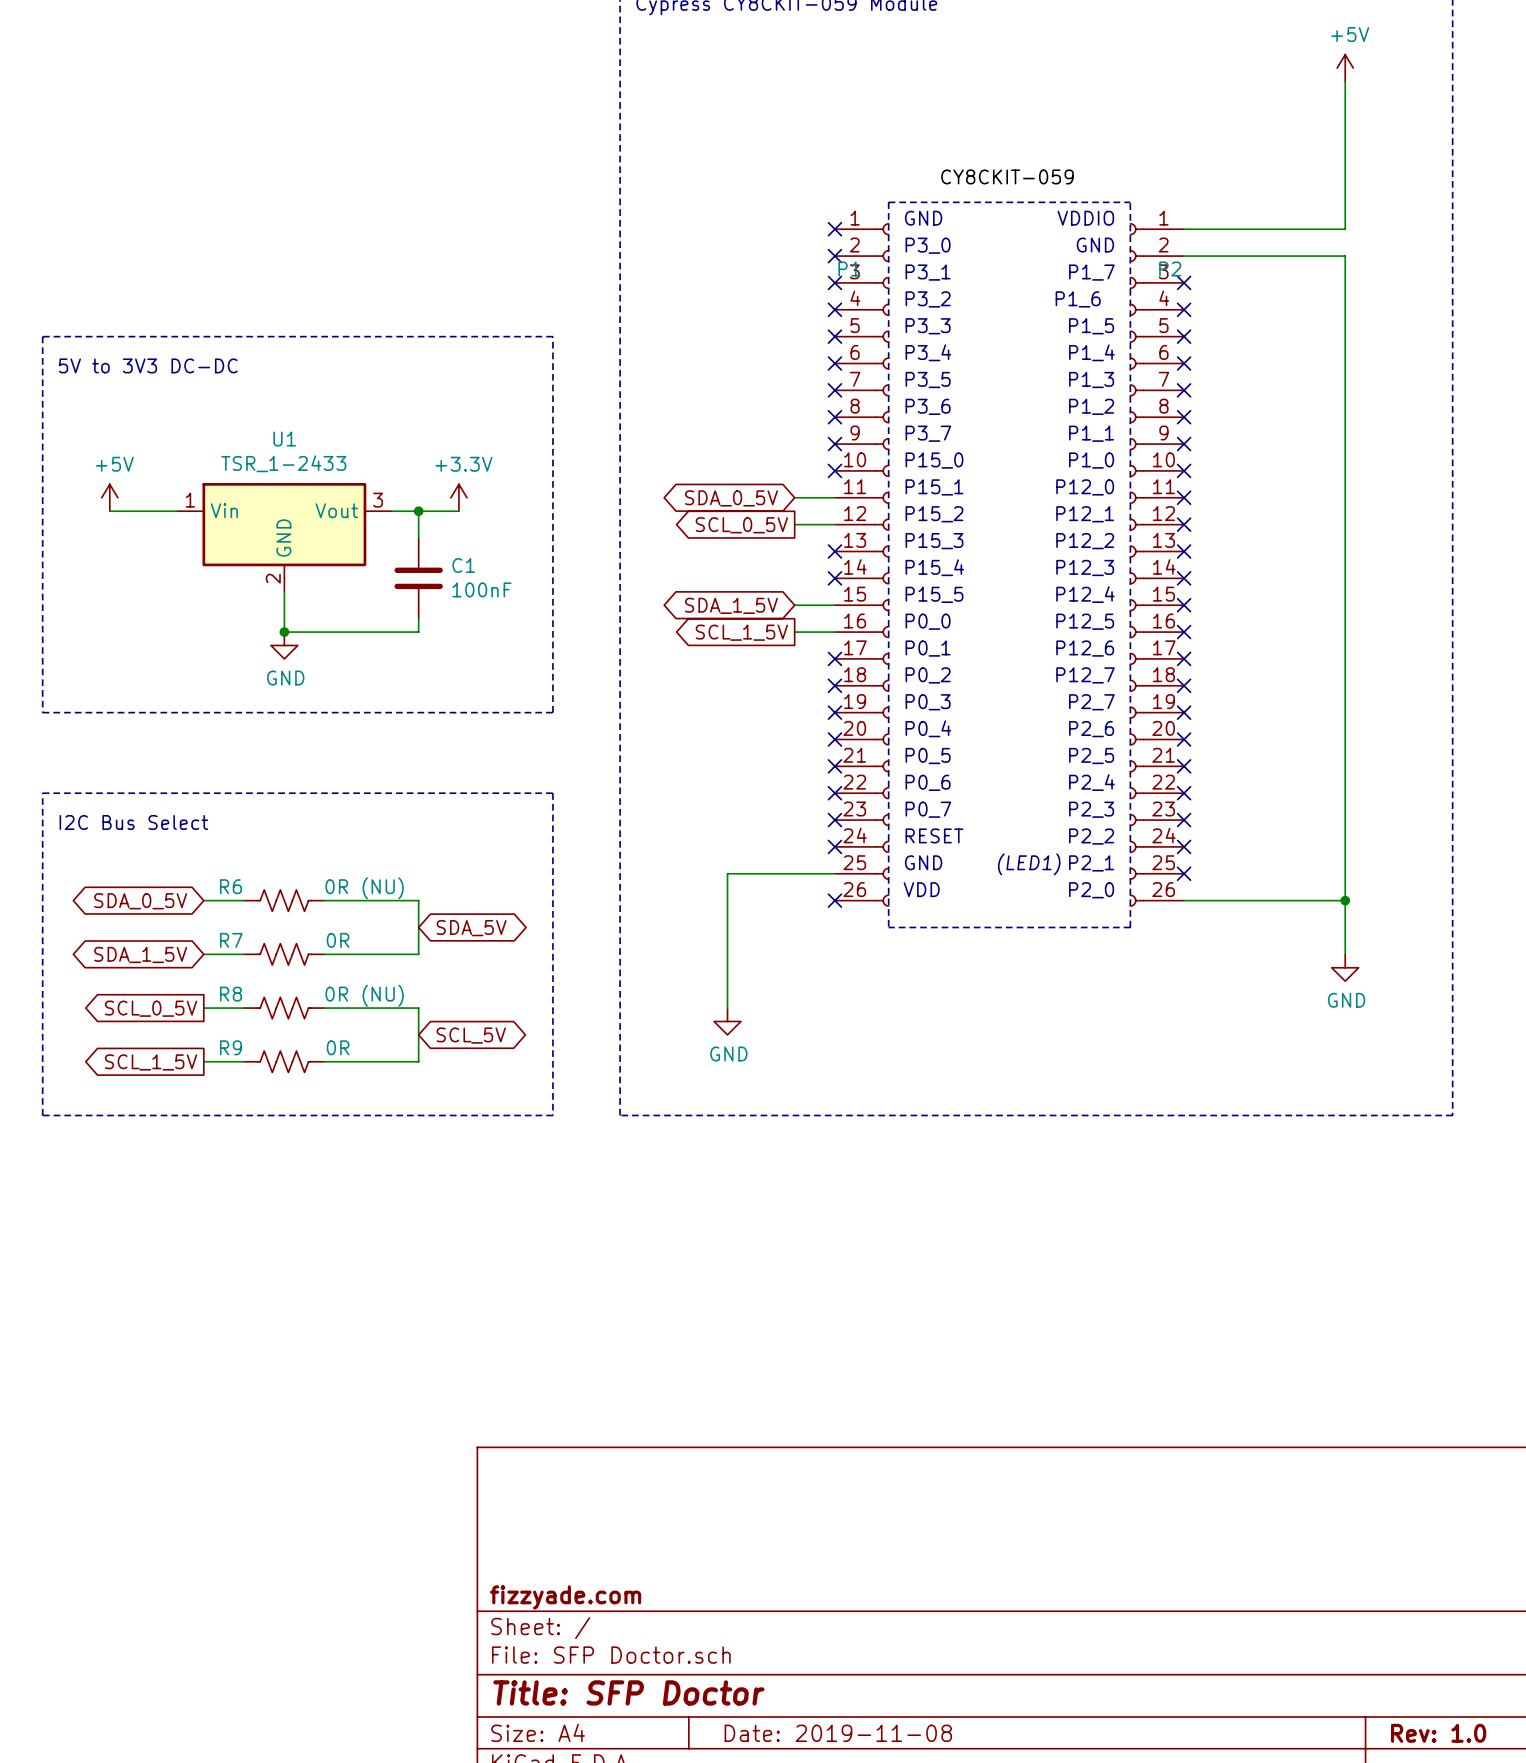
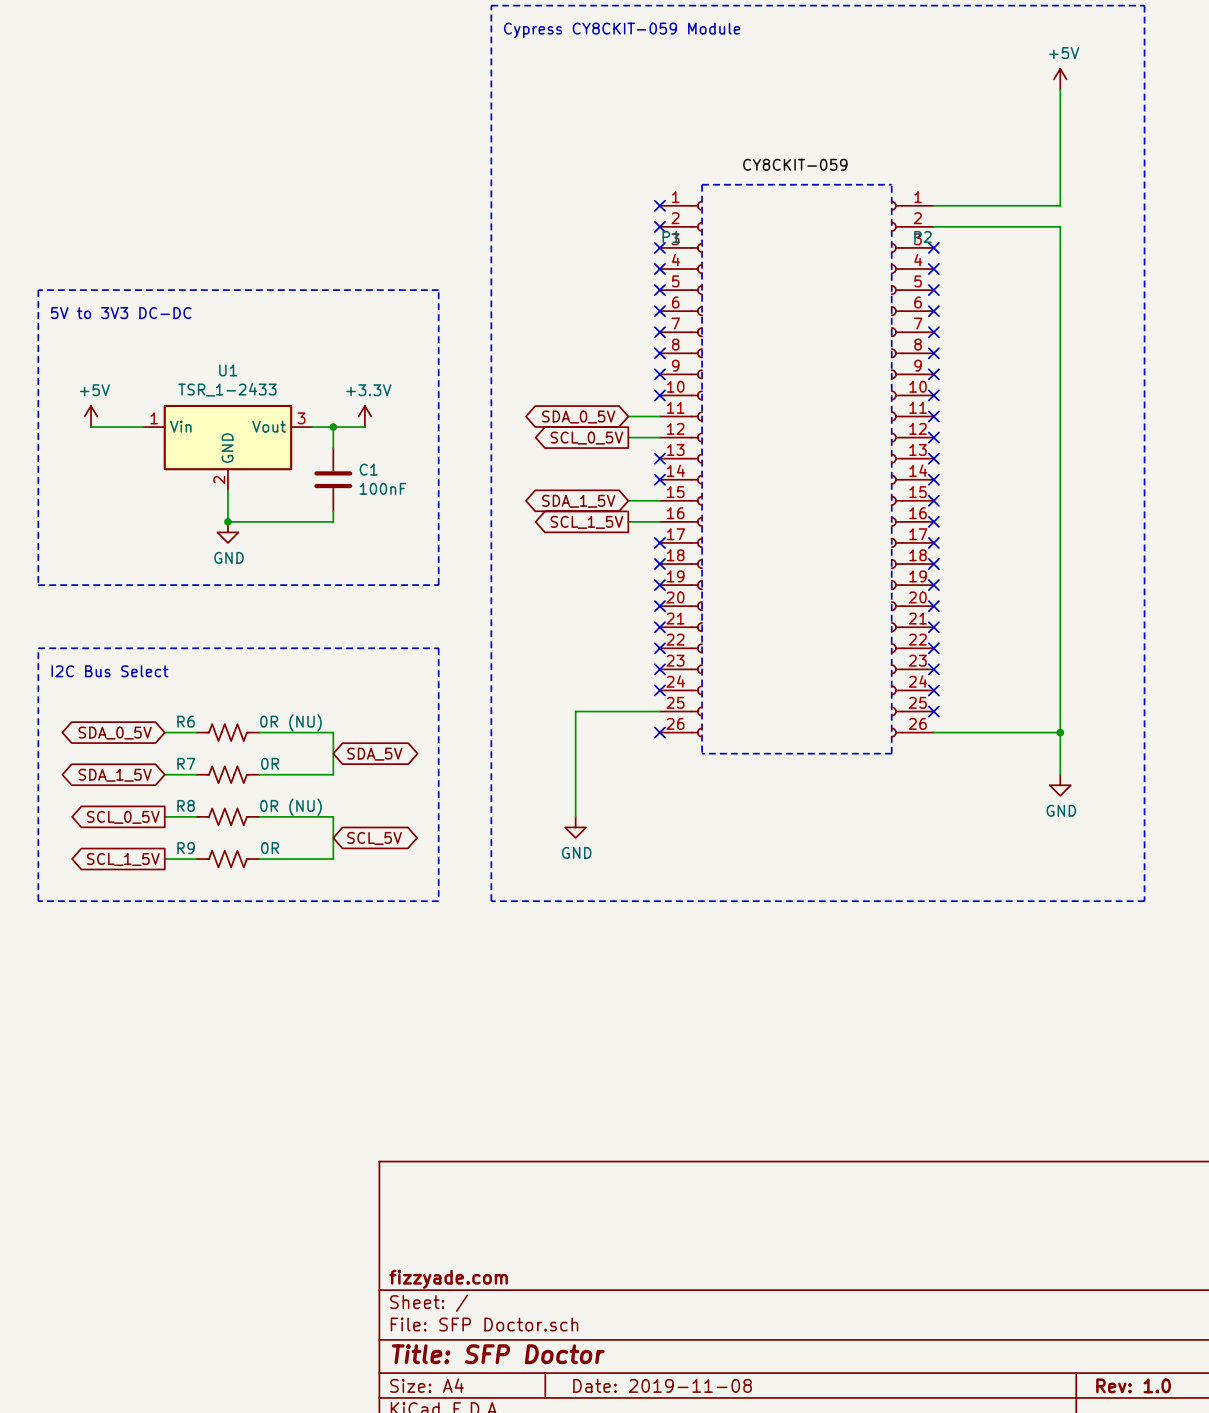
text: GND (923, 218) -> none
text: VDDIO (1085, 218) -> none
text: P3_0 (928, 245) -> none
text: GND (1095, 245) -> none
text: P3_1 (928, 272) -> none
text: P1_7 (1091, 272) -> none
text: P3_2 (928, 299) -> none
text: P1_6 (1078, 299) -> none
text: P3_3 (928, 326) -> none
text: P1_5 (1091, 326) -> none
text: P3_4 (928, 352) -> none
text: P1_4 (1091, 352) -> none
text: P3_5 (928, 379) -> none
text: P1_3 (1091, 379) -> none
text: P3_6 (928, 406) -> none
text: P1_2 (1091, 406) -> none
text: P3_7 (928, 433) -> none
text: P1_1 (1091, 433) -> none
text: P15_0 (934, 460) -> none
text: P1_0 (1091, 460) -> none
text: P15_1 (934, 487) -> none
text: P12_0 (1085, 487) -> none
text: P15_2 (934, 514) -> none
text: P12_1 (1085, 514) -> none
text: P15_3 (934, 541) -> none
text: P12_2 (1085, 541) -> none
text: P15_4 (934, 567) -> none
text: P12_3 (1085, 567) -> none
text: P15_5 (934, 594) -> none
text: P12_4 (1085, 594) -> none
text: P0_0 (928, 621) -> none
text: P12_5 (1085, 621) -> none
text: P0_1 (928, 648) -> none
text: P12_6 (1085, 648) -> none
text: P0_2 (928, 675) -> none
text: P12_7 (1085, 675) -> none
text: P0_3 (928, 702) -> none
text: P2_7 (1091, 702) -> none
text: P0_4 (928, 728) -> none
text: P2_6 (1091, 729) -> none
text: P0_5 (928, 755) -> none
text: P2_5 (1091, 755) -> none
text: P0_6 (928, 782) -> none
text: P2_4 (1091, 782) -> none
text: P0_7 (928, 809) -> none
text: P2_3 (1091, 809) -> none
text: RESET (934, 835) -> none
text: P2_2 (1091, 836) -> none
text: GND (923, 862) -> none
text: P2_1 (1091, 863) -> none
text: (LED1) (1029, 864) -> none
text: VDD (921, 889) -> none
text: P2_0 (1091, 890) -> none

